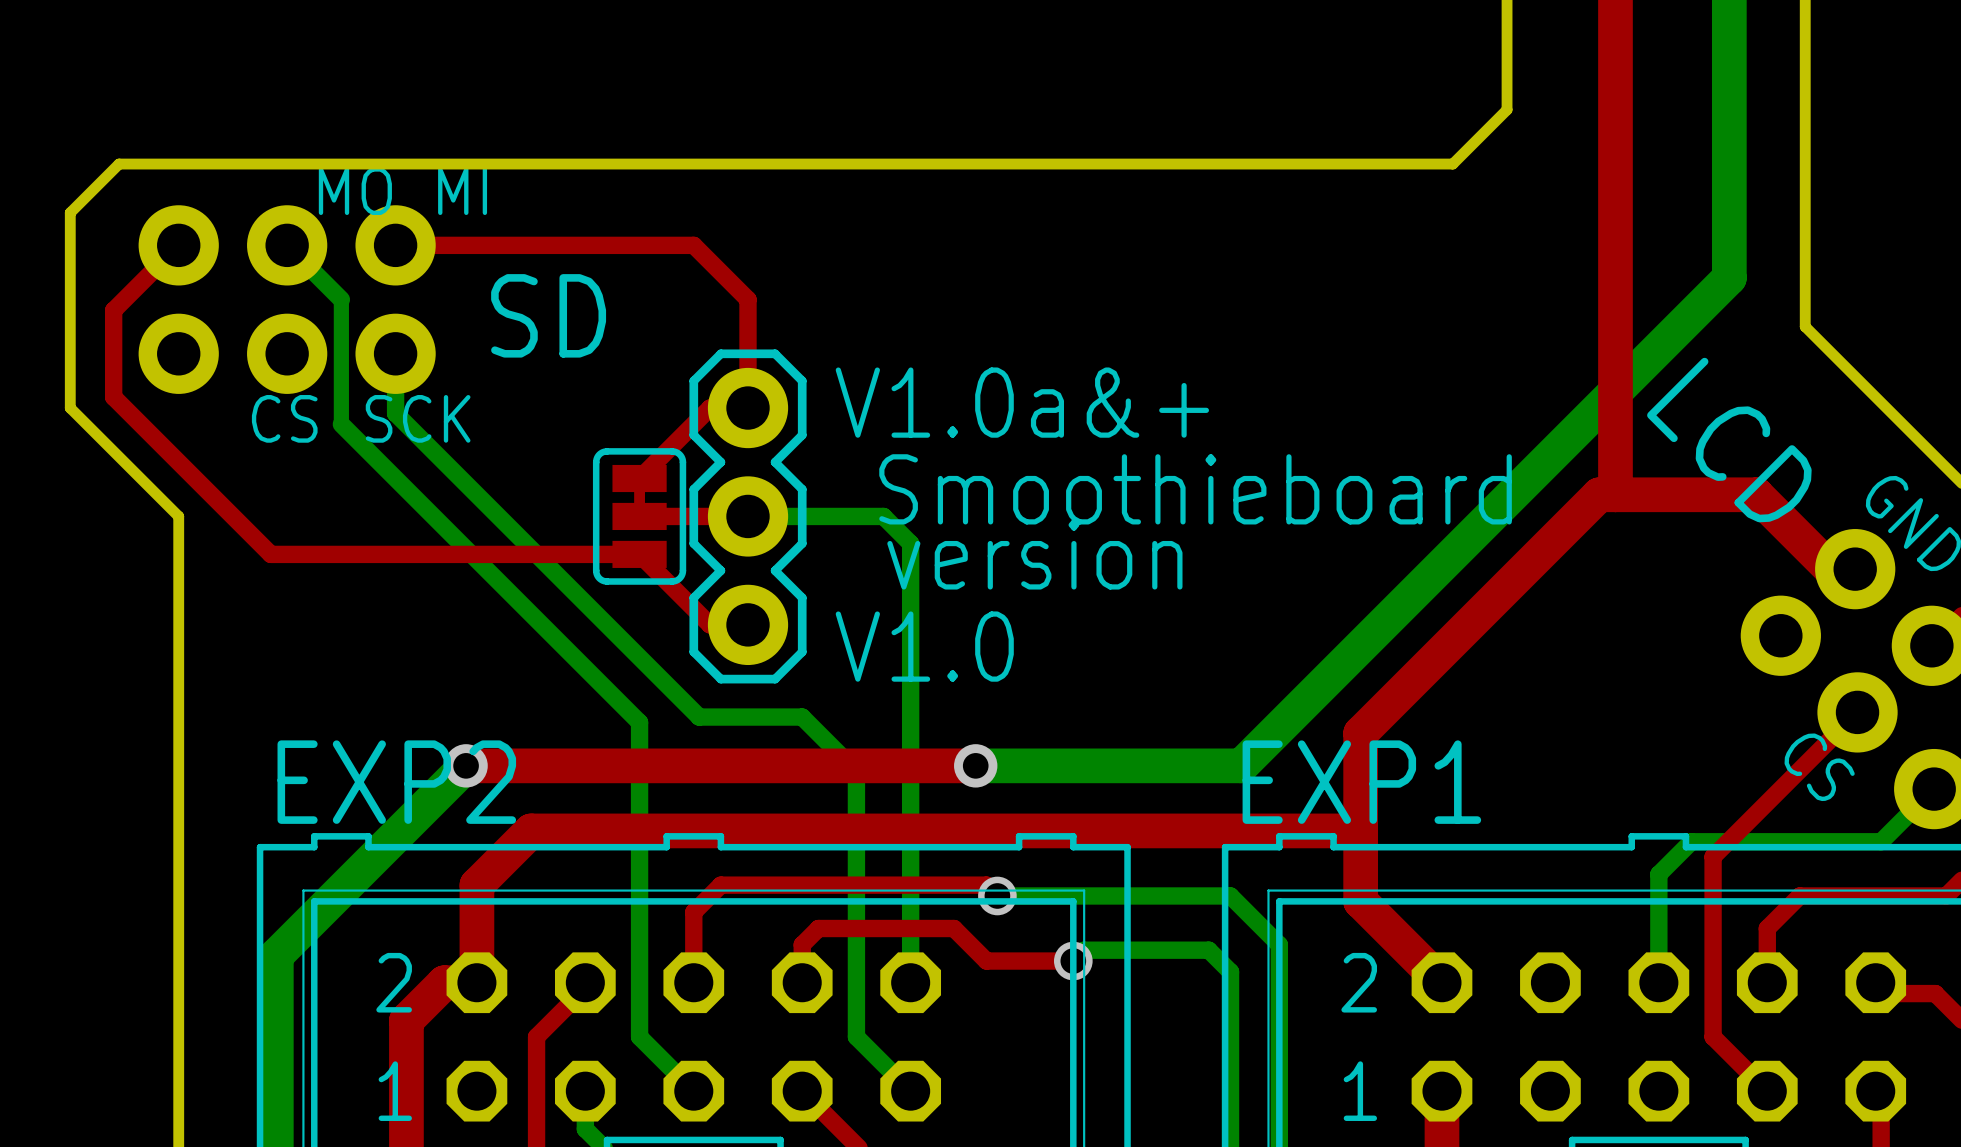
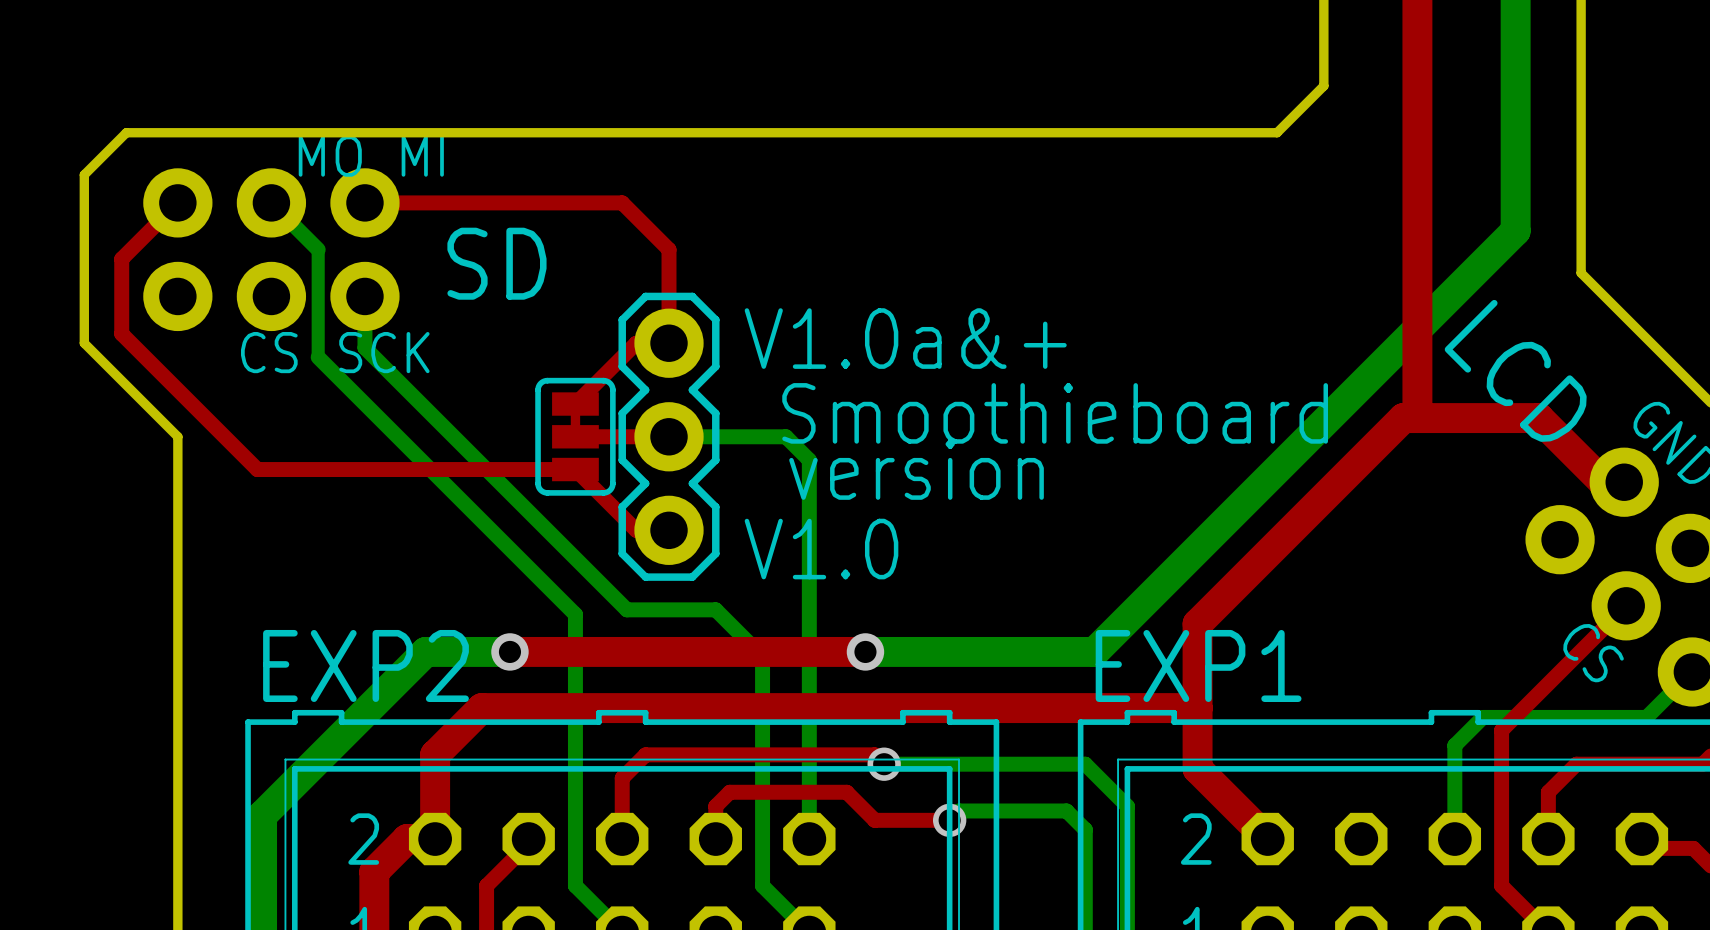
top track: (466, 765) (563, 765) -> none
bottom track: none -> (425, 651) (509, 651)
via position: (466, 765) -> (509, 651)

